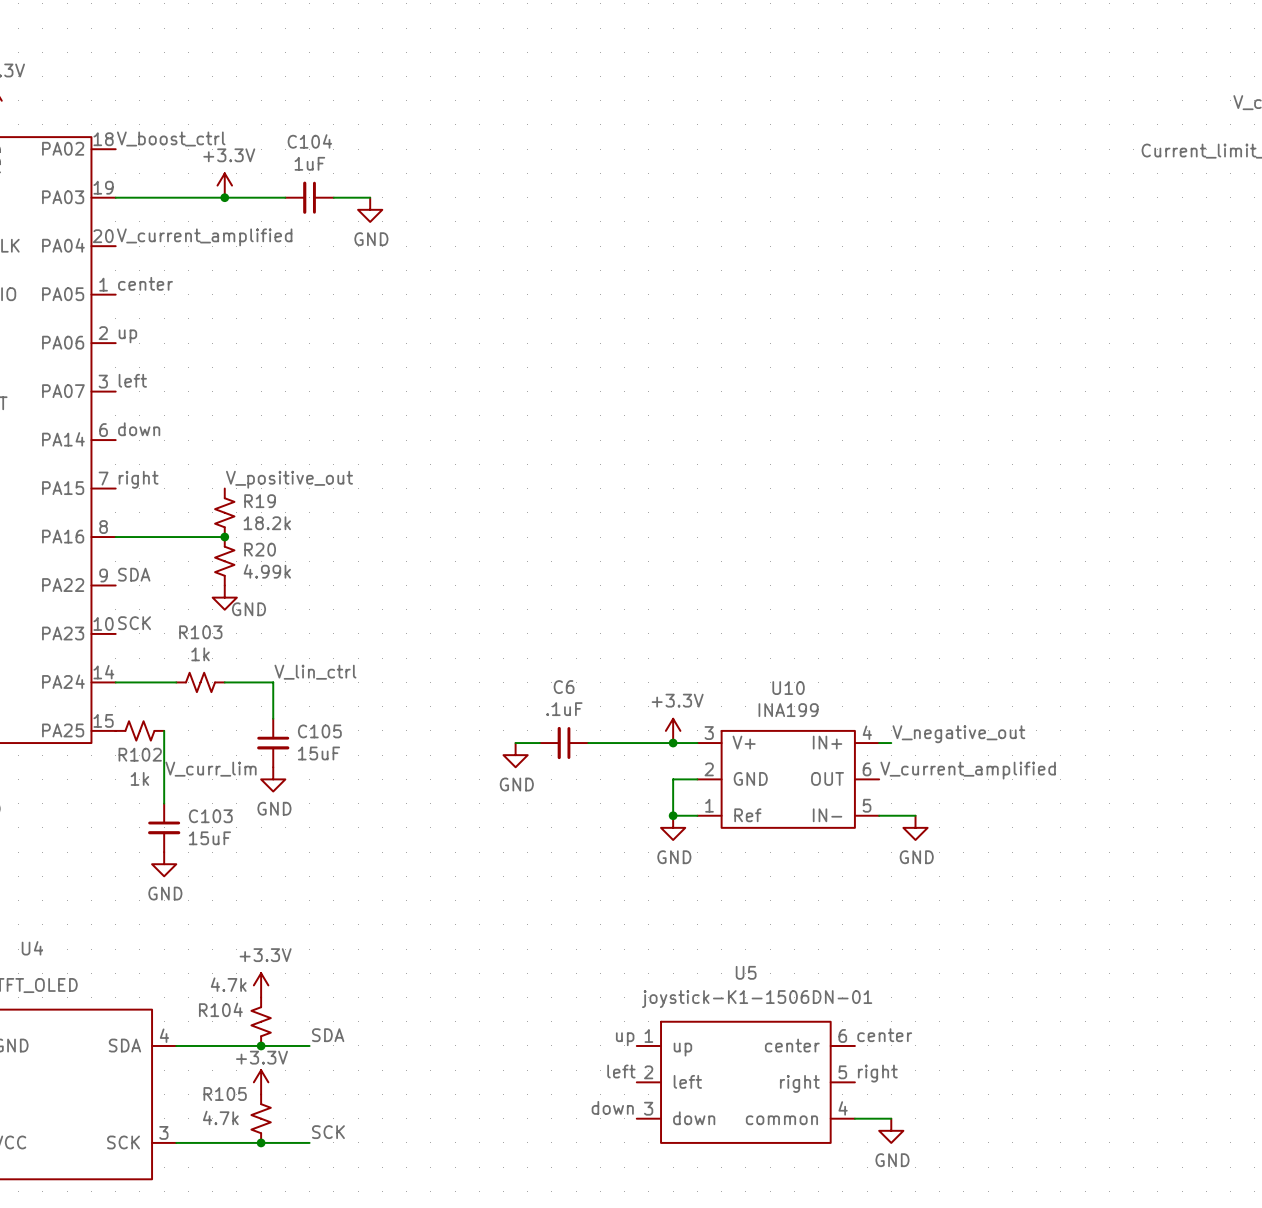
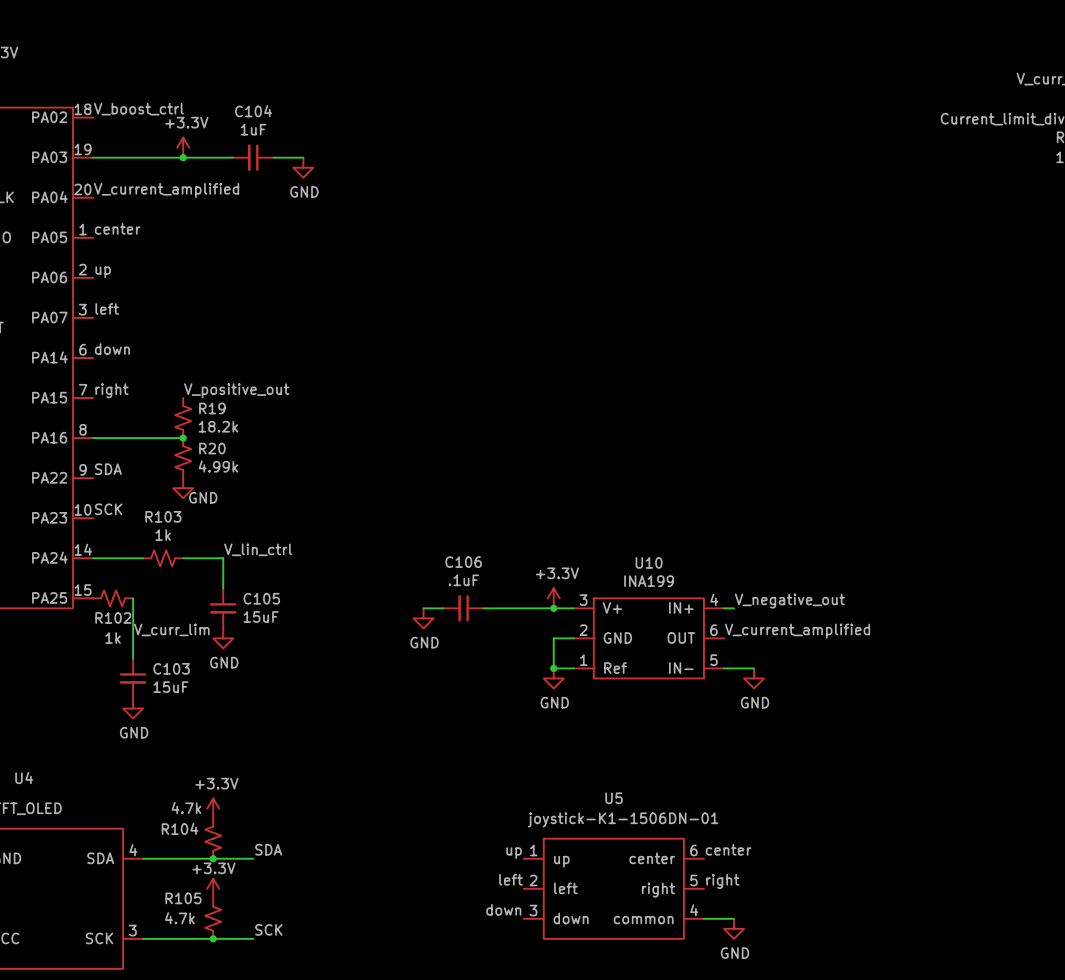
C6 name: C6 (564, 687) -> C106 (463, 562)

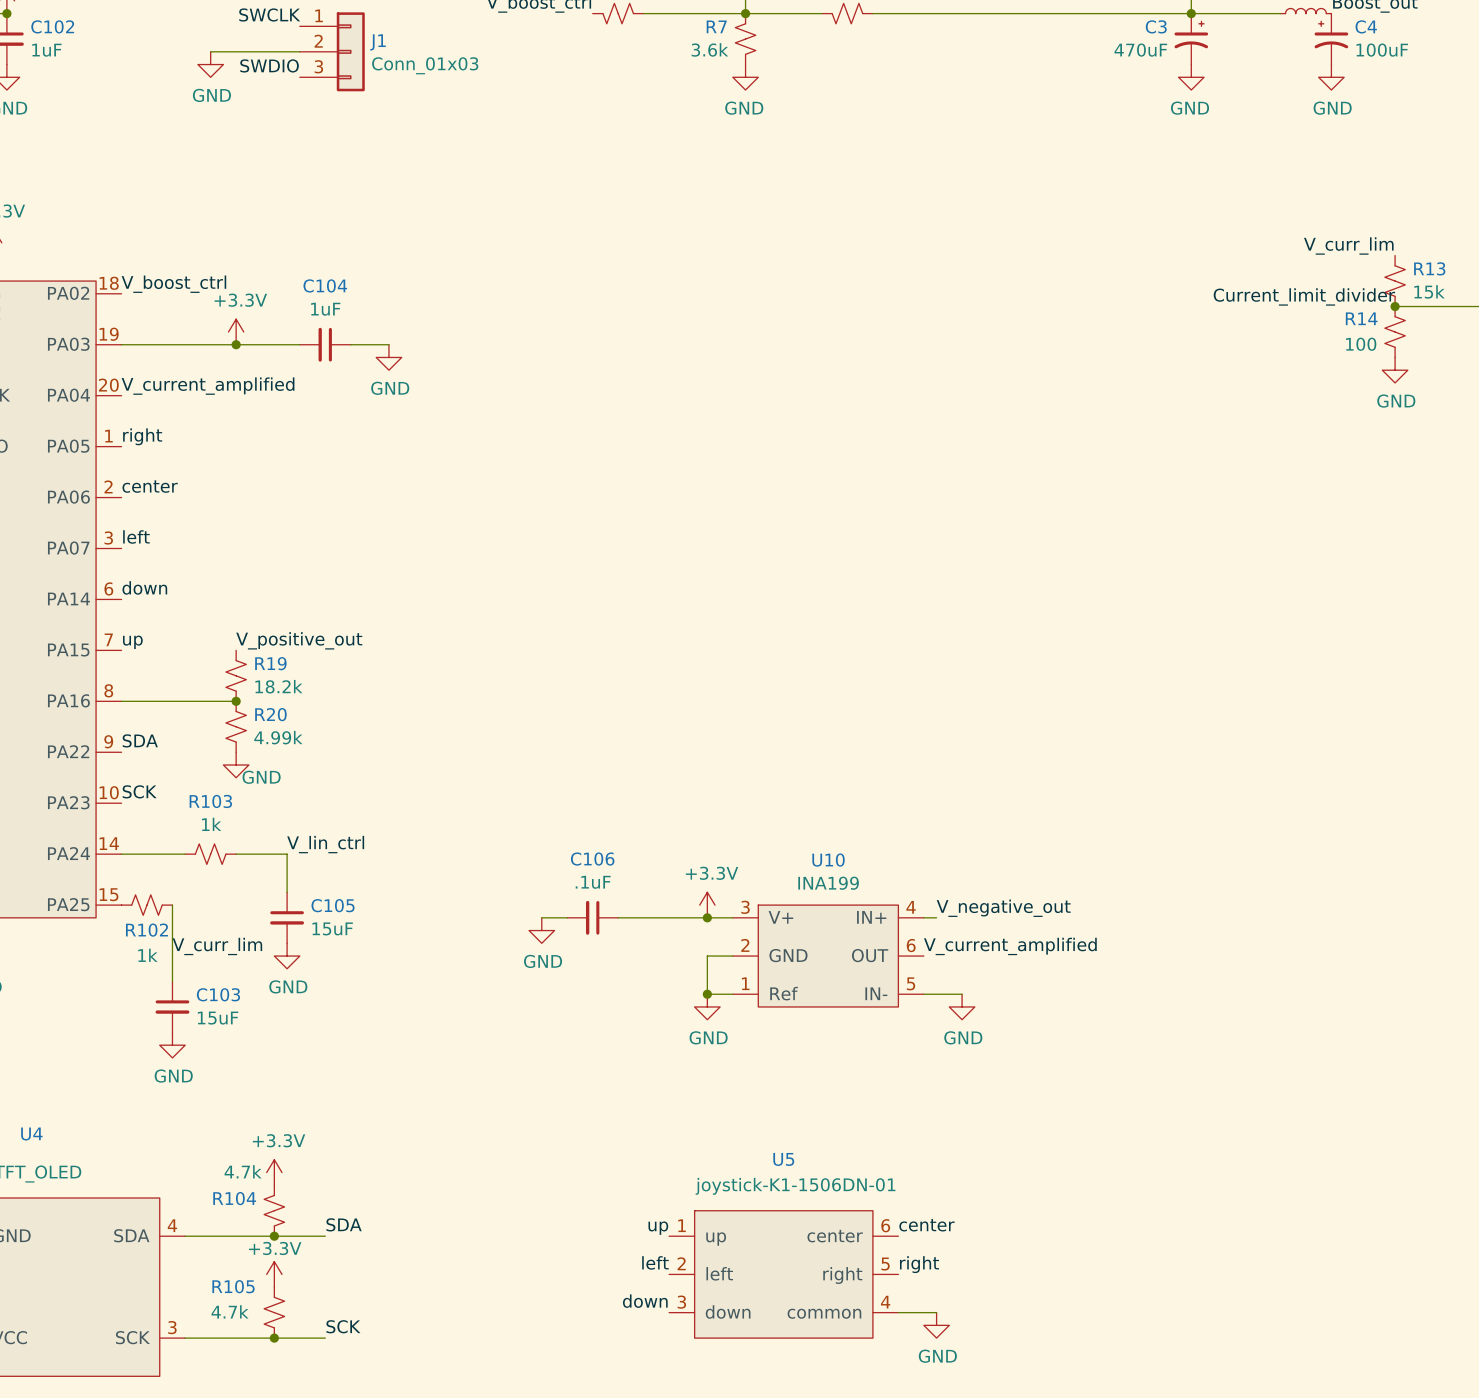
label: center (117, 228) -> right (142, 436)
label: up (103, 272) -> center (150, 486)
label: right (111, 390) -> up (132, 642)

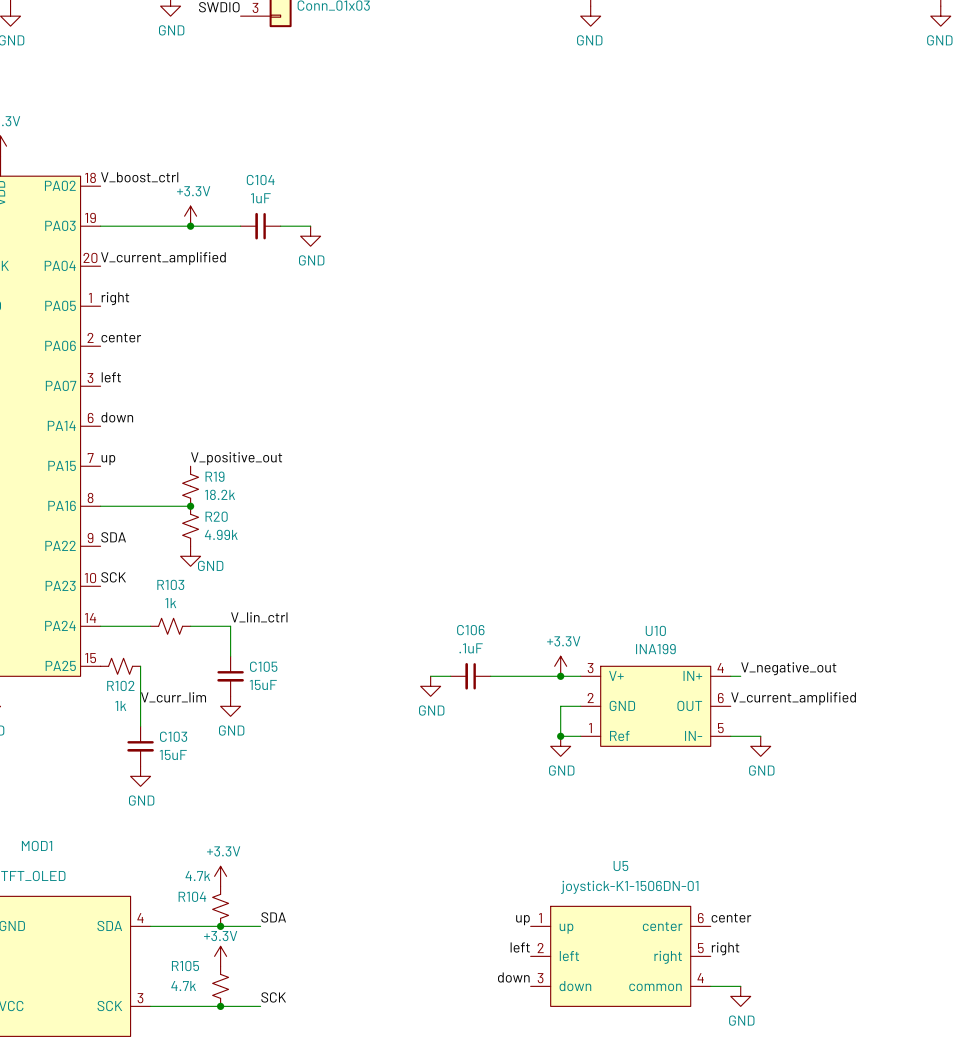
U4 name: U4 (31, 1133) -> MOD1 (37, 845)

